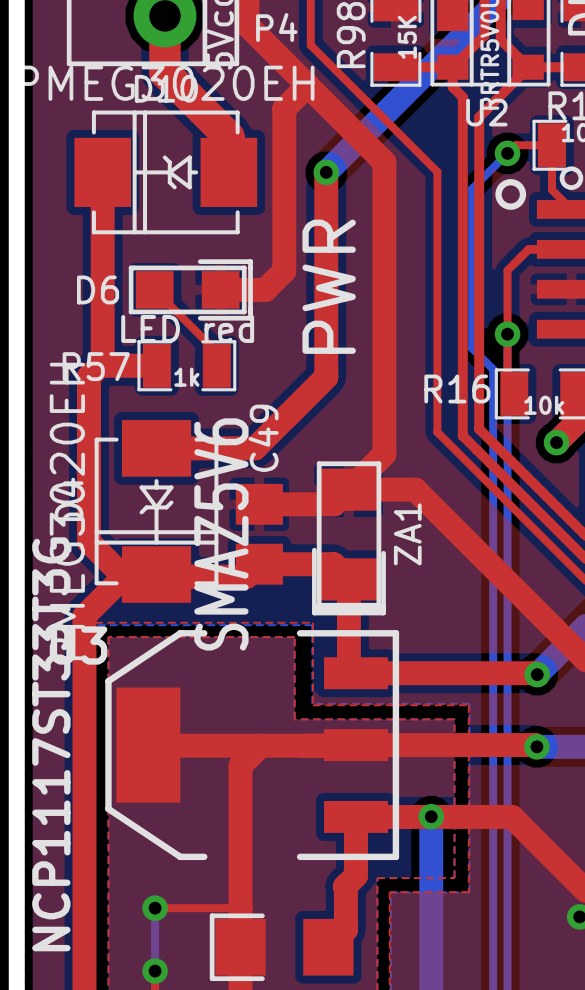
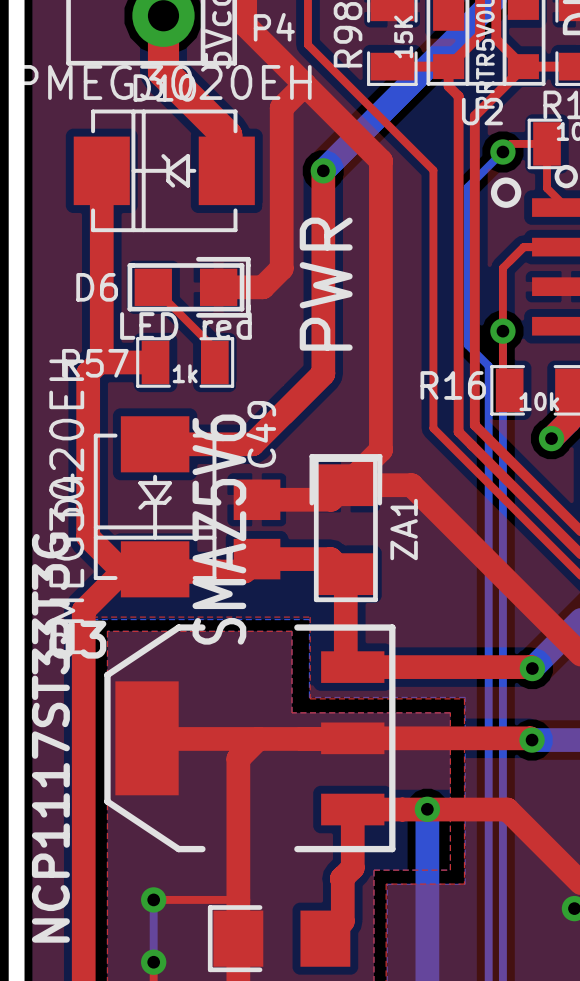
ZA1 footprint: [312, 461, 386, 616] -> [309, 454, 383, 603]

